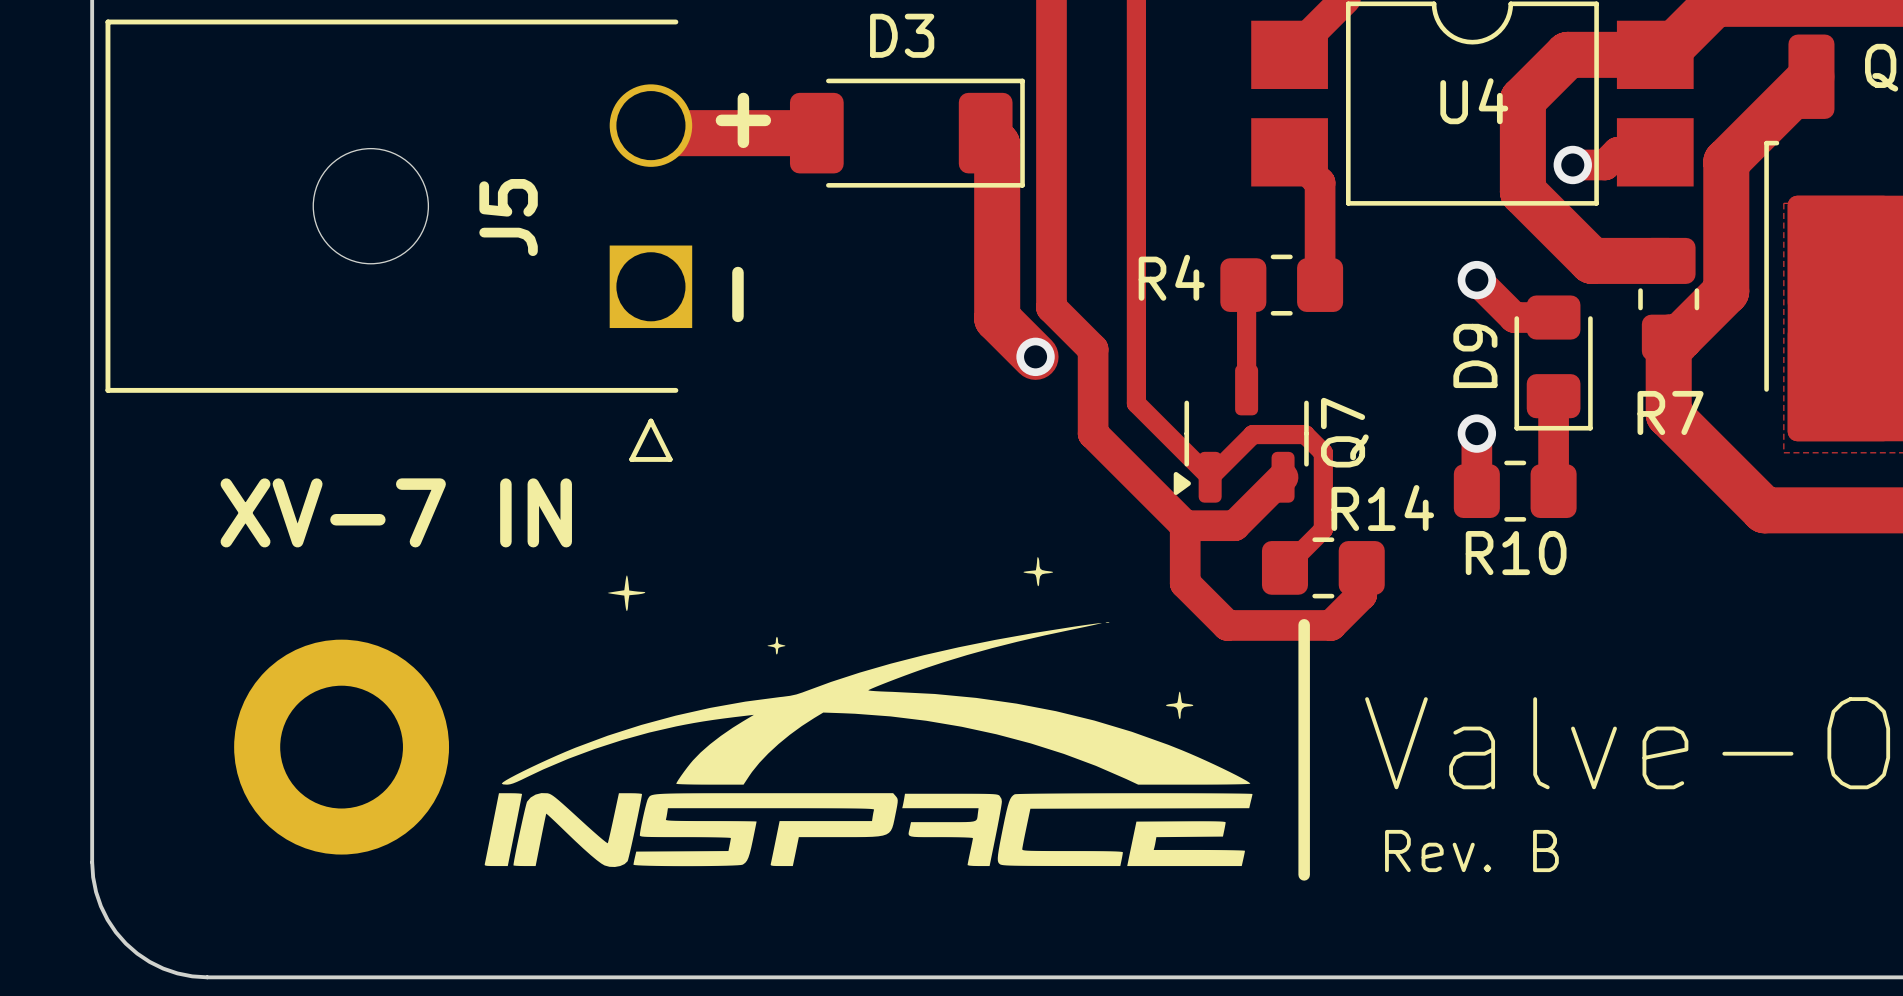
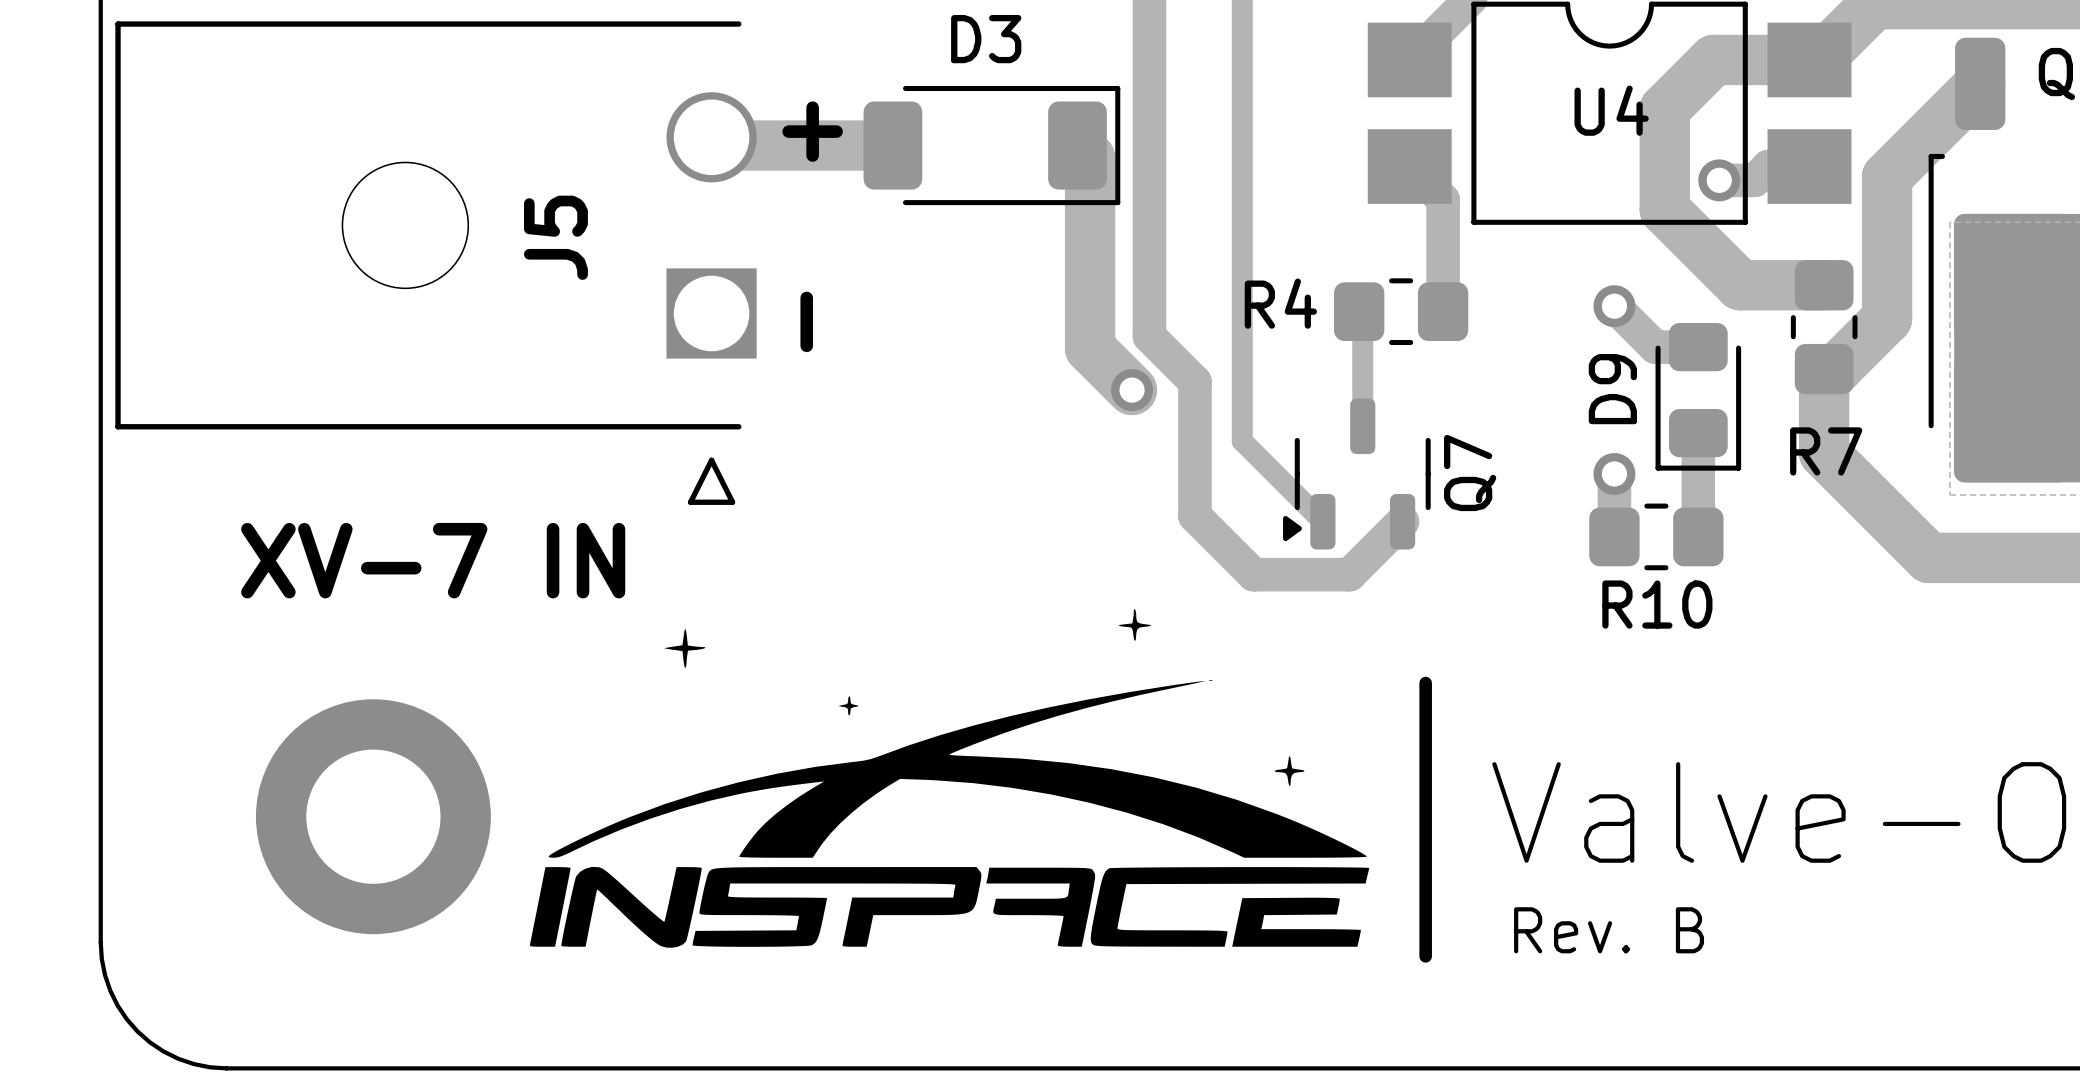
track: (1093, 433) (1185, 525) (1185, 583) (1227, 625) (1331, 625) (1361, 594) (1361, 567) -> (1194, 473) (1194, 515) (1253, 574) (1295, 574)
track: (1210, 477) (1252, 434) (1305, 434) (1323, 452) (1323, 529) (1284, 567) -> none
R14: (1323, 567) -> none

